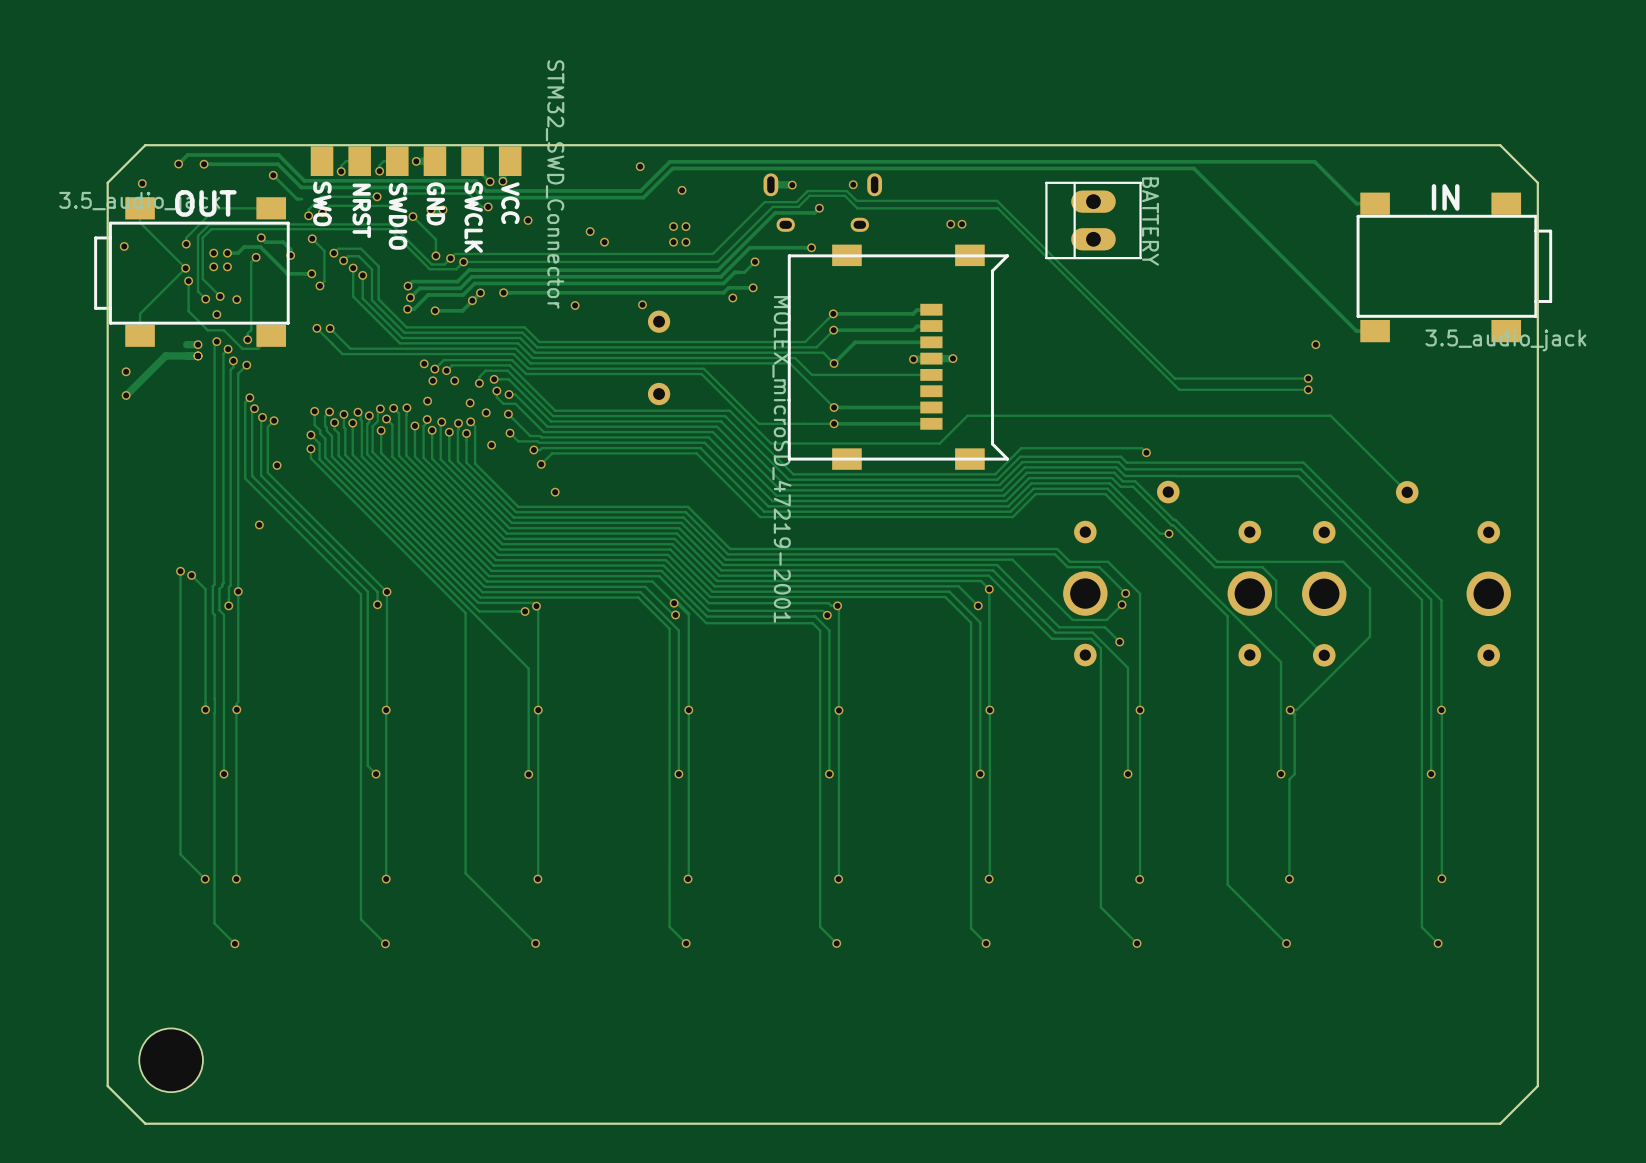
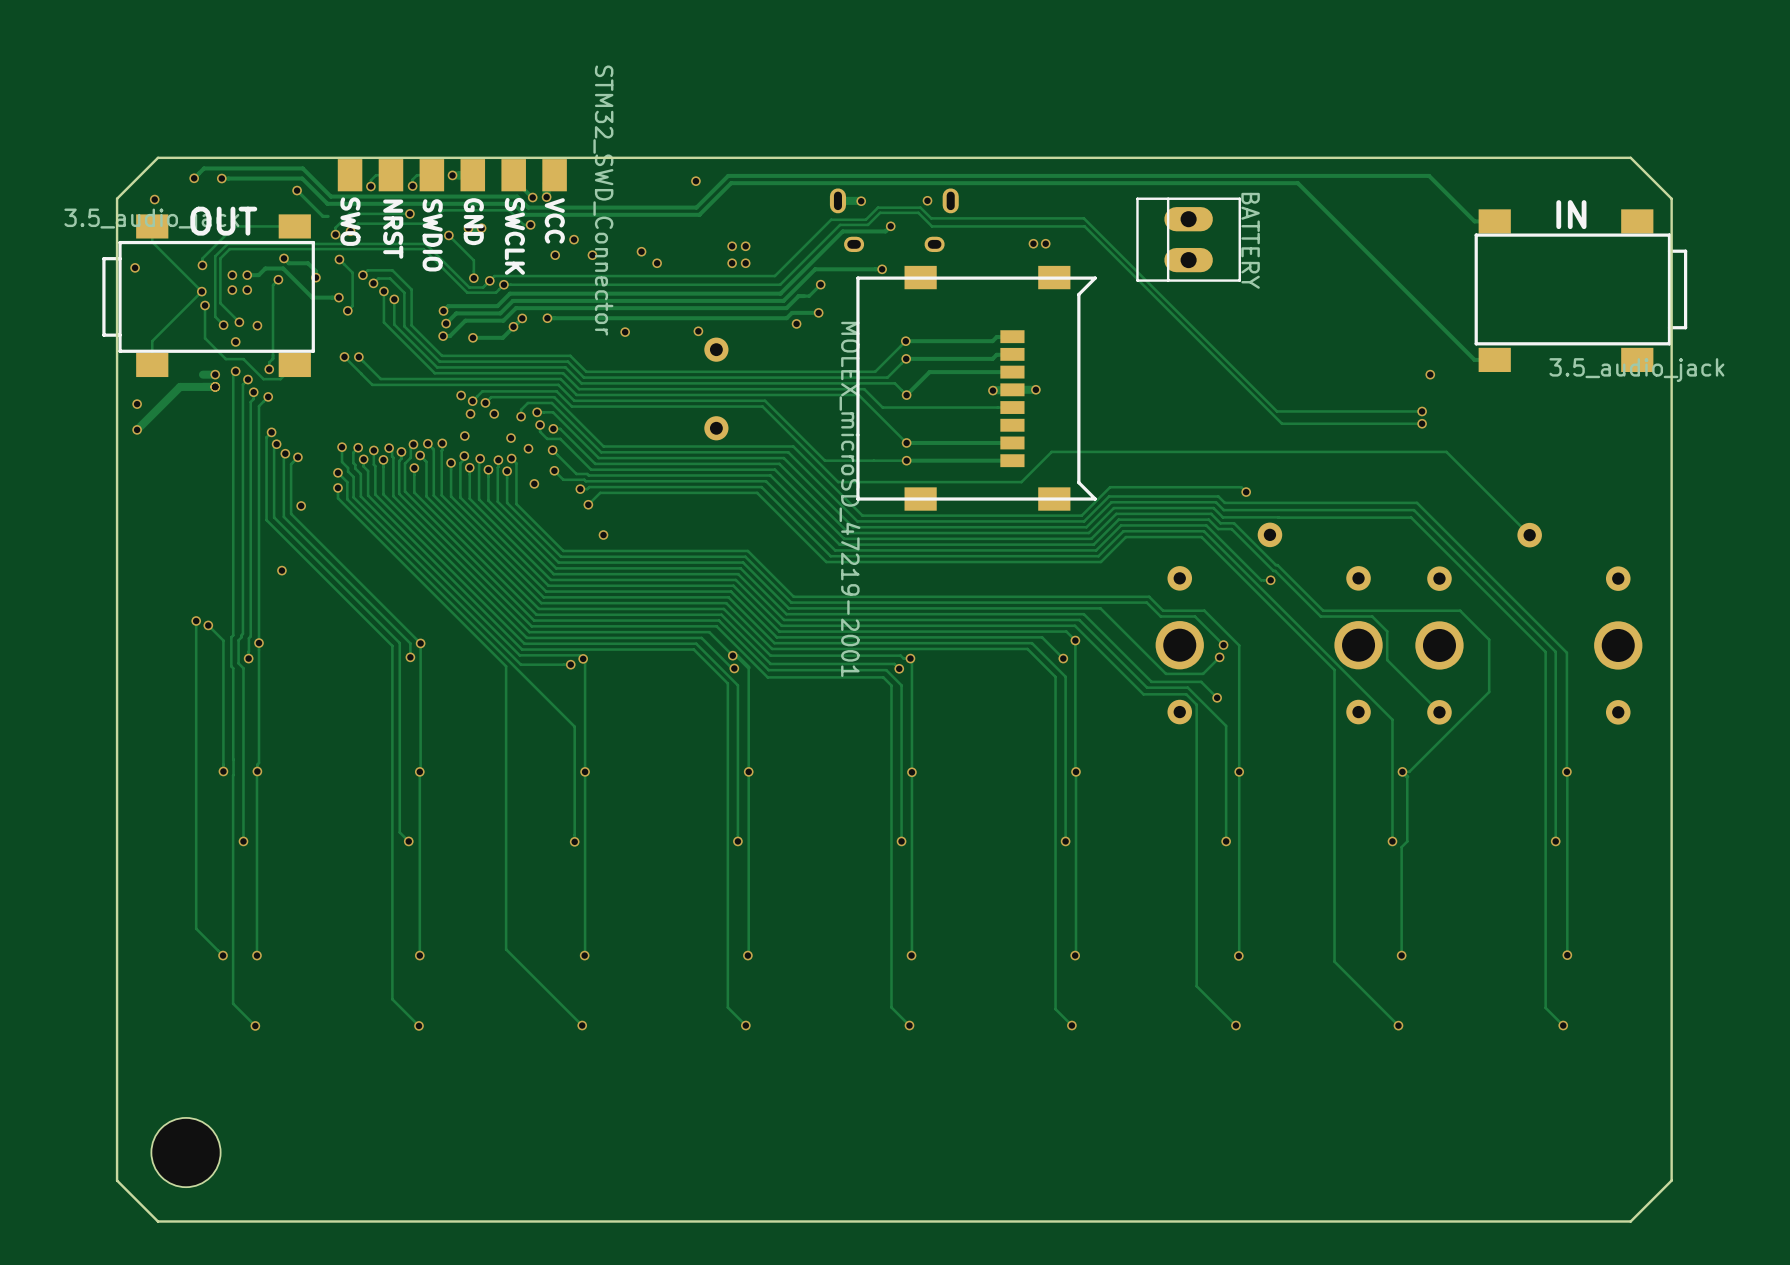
via: (682, 190) -> none
via: none -> (555, 255)
via: none -> (592, 255)

